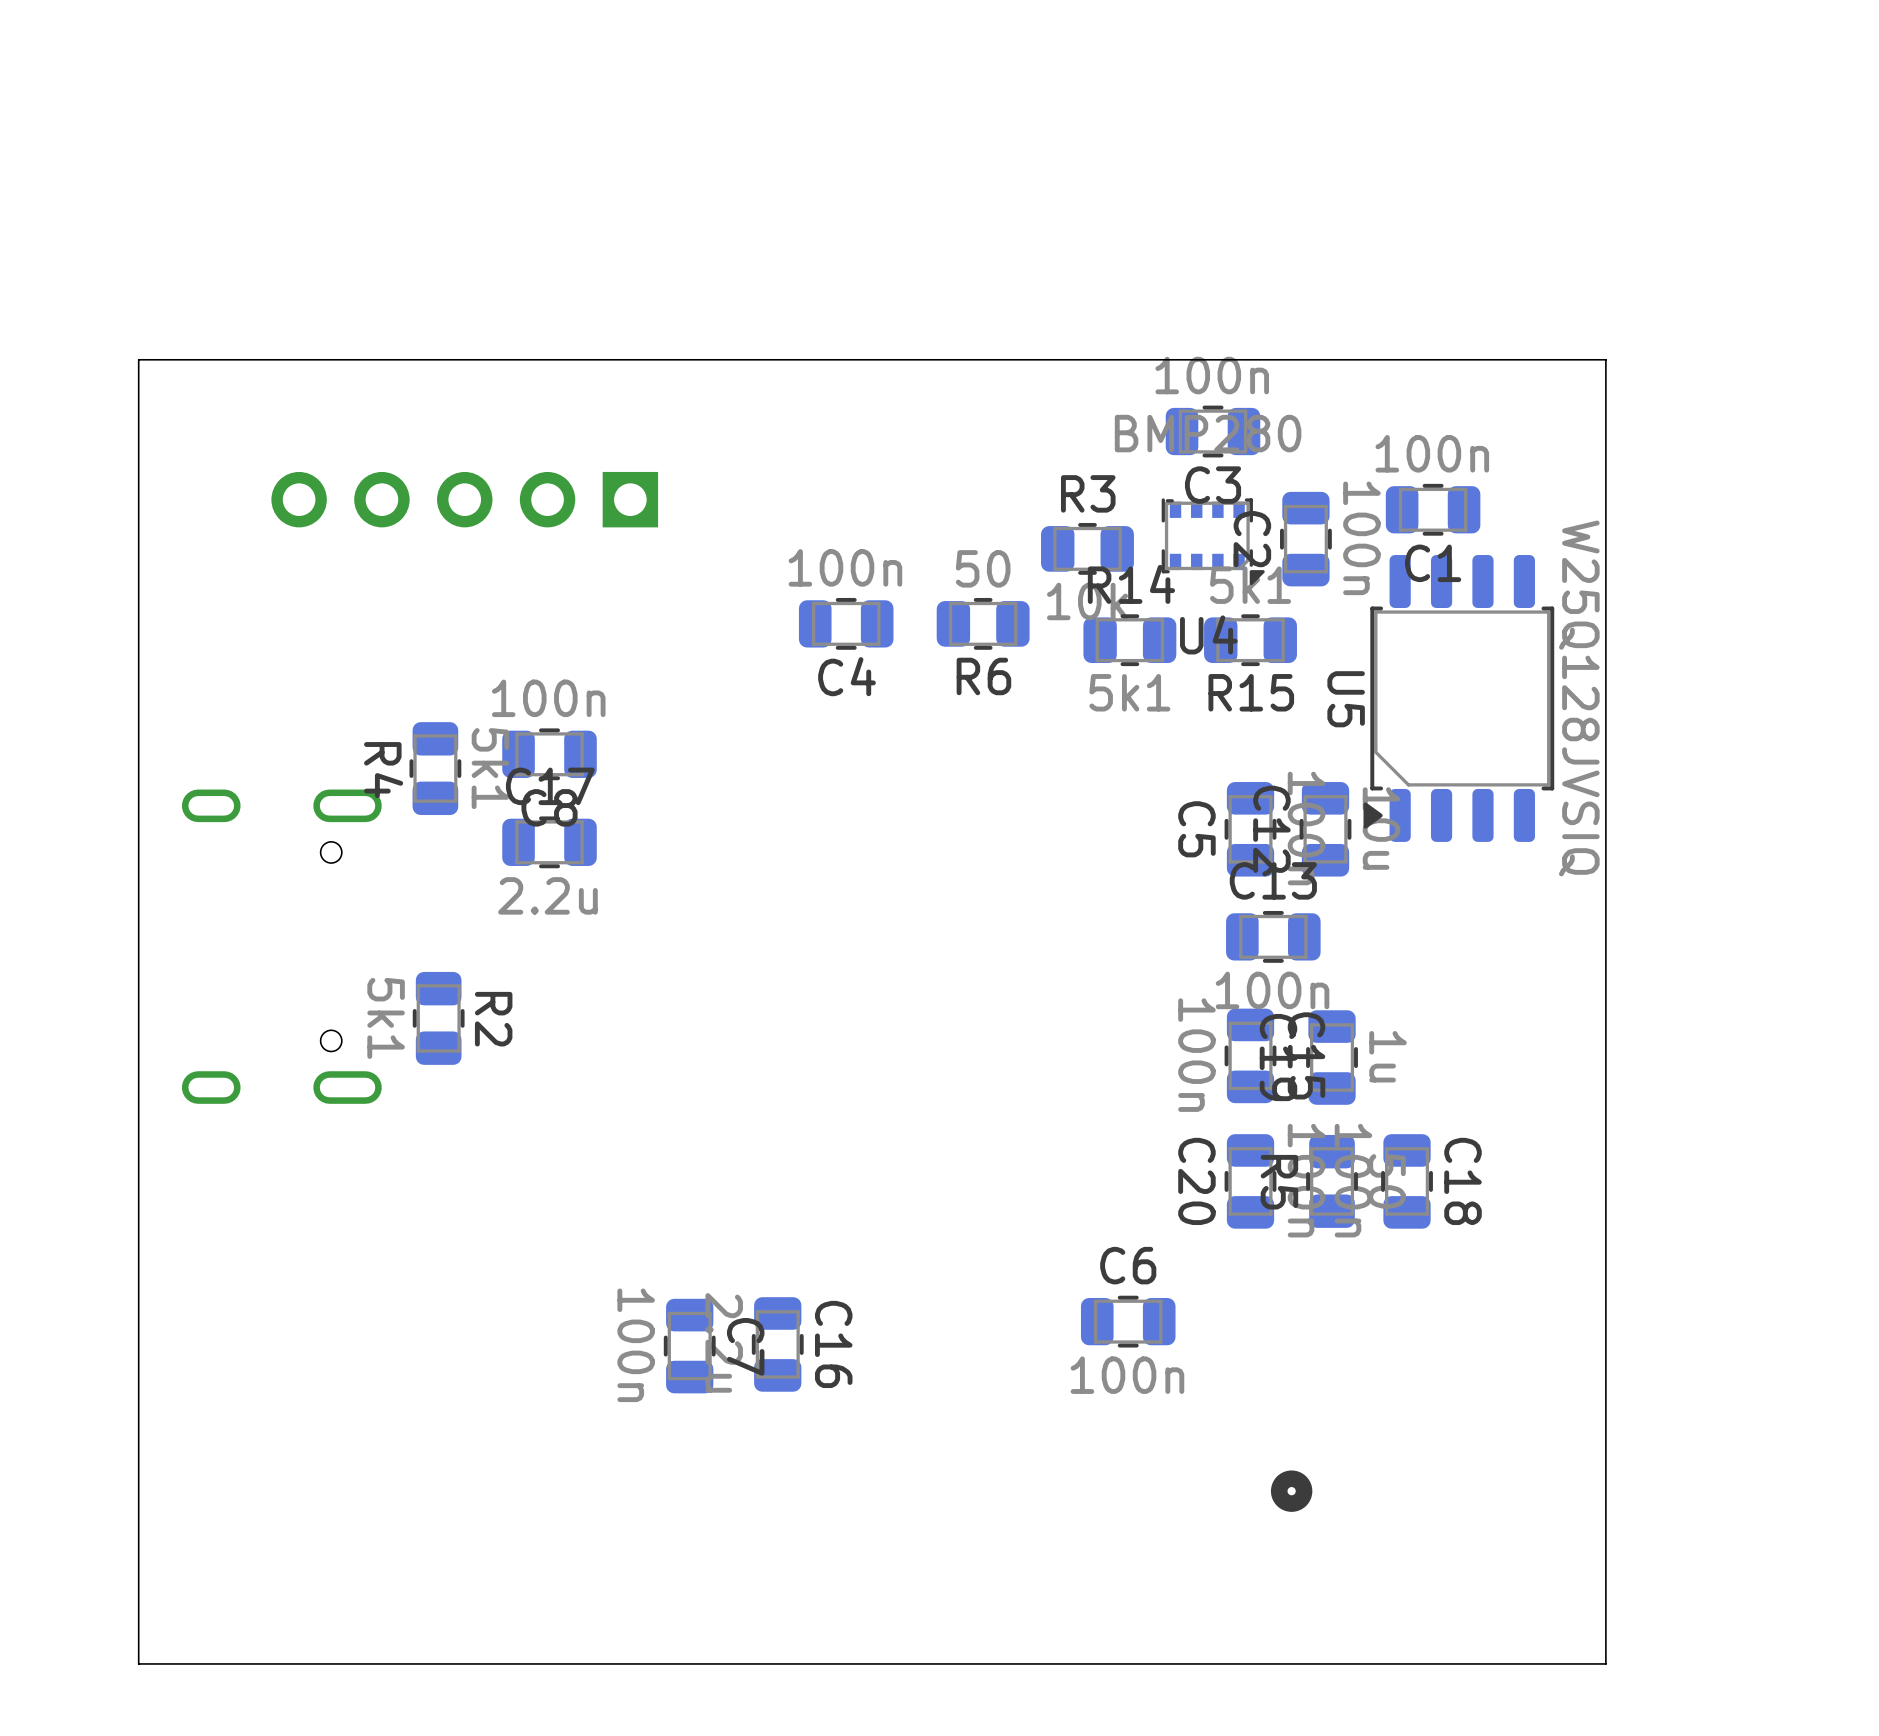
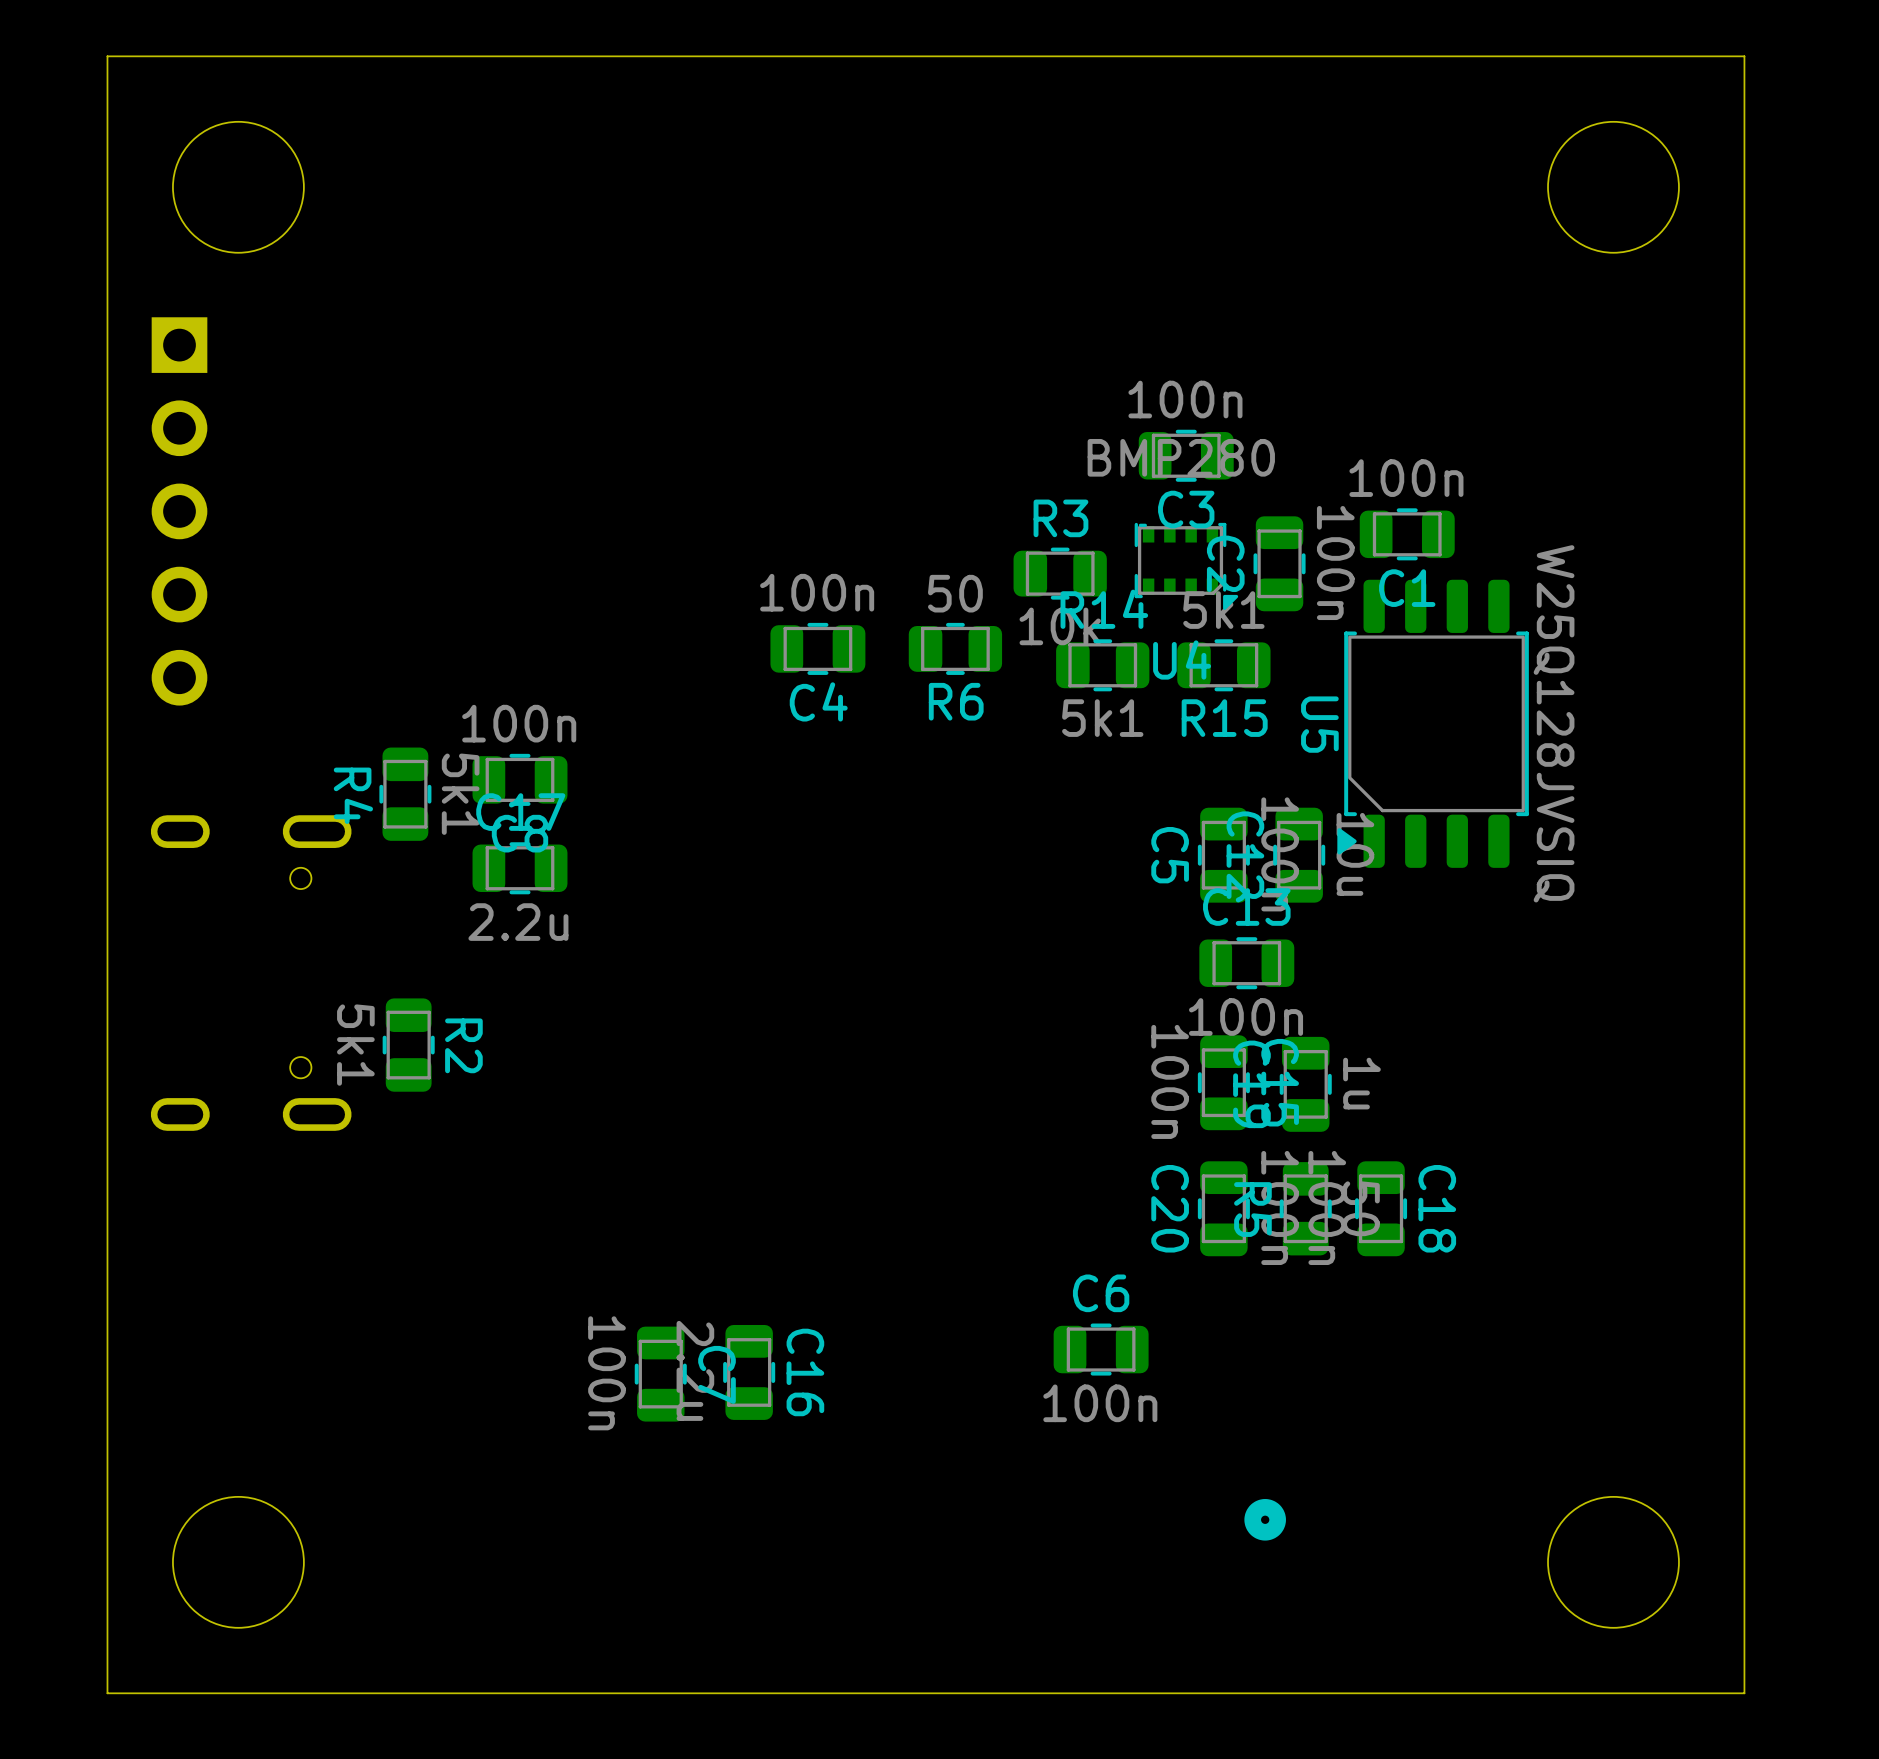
round board edge: none -> [172, 120, 305, 254]
round board edge: none -> [1547, 120, 1680, 254]
board edge: (138, 359) (1605, 359) (1605, 1663) -> (107, 383) (107, 56) (1744, 56) (1744, 1693) (1580, 1693)
part rotation: 0° (464, 499) -> 90° counterclockwise (179, 511)
part position: (464, 499) -> (179, 511)
round board edge: none -> [172, 1496, 305, 1629]
round board edge: none -> [1547, 1496, 1680, 1629]

